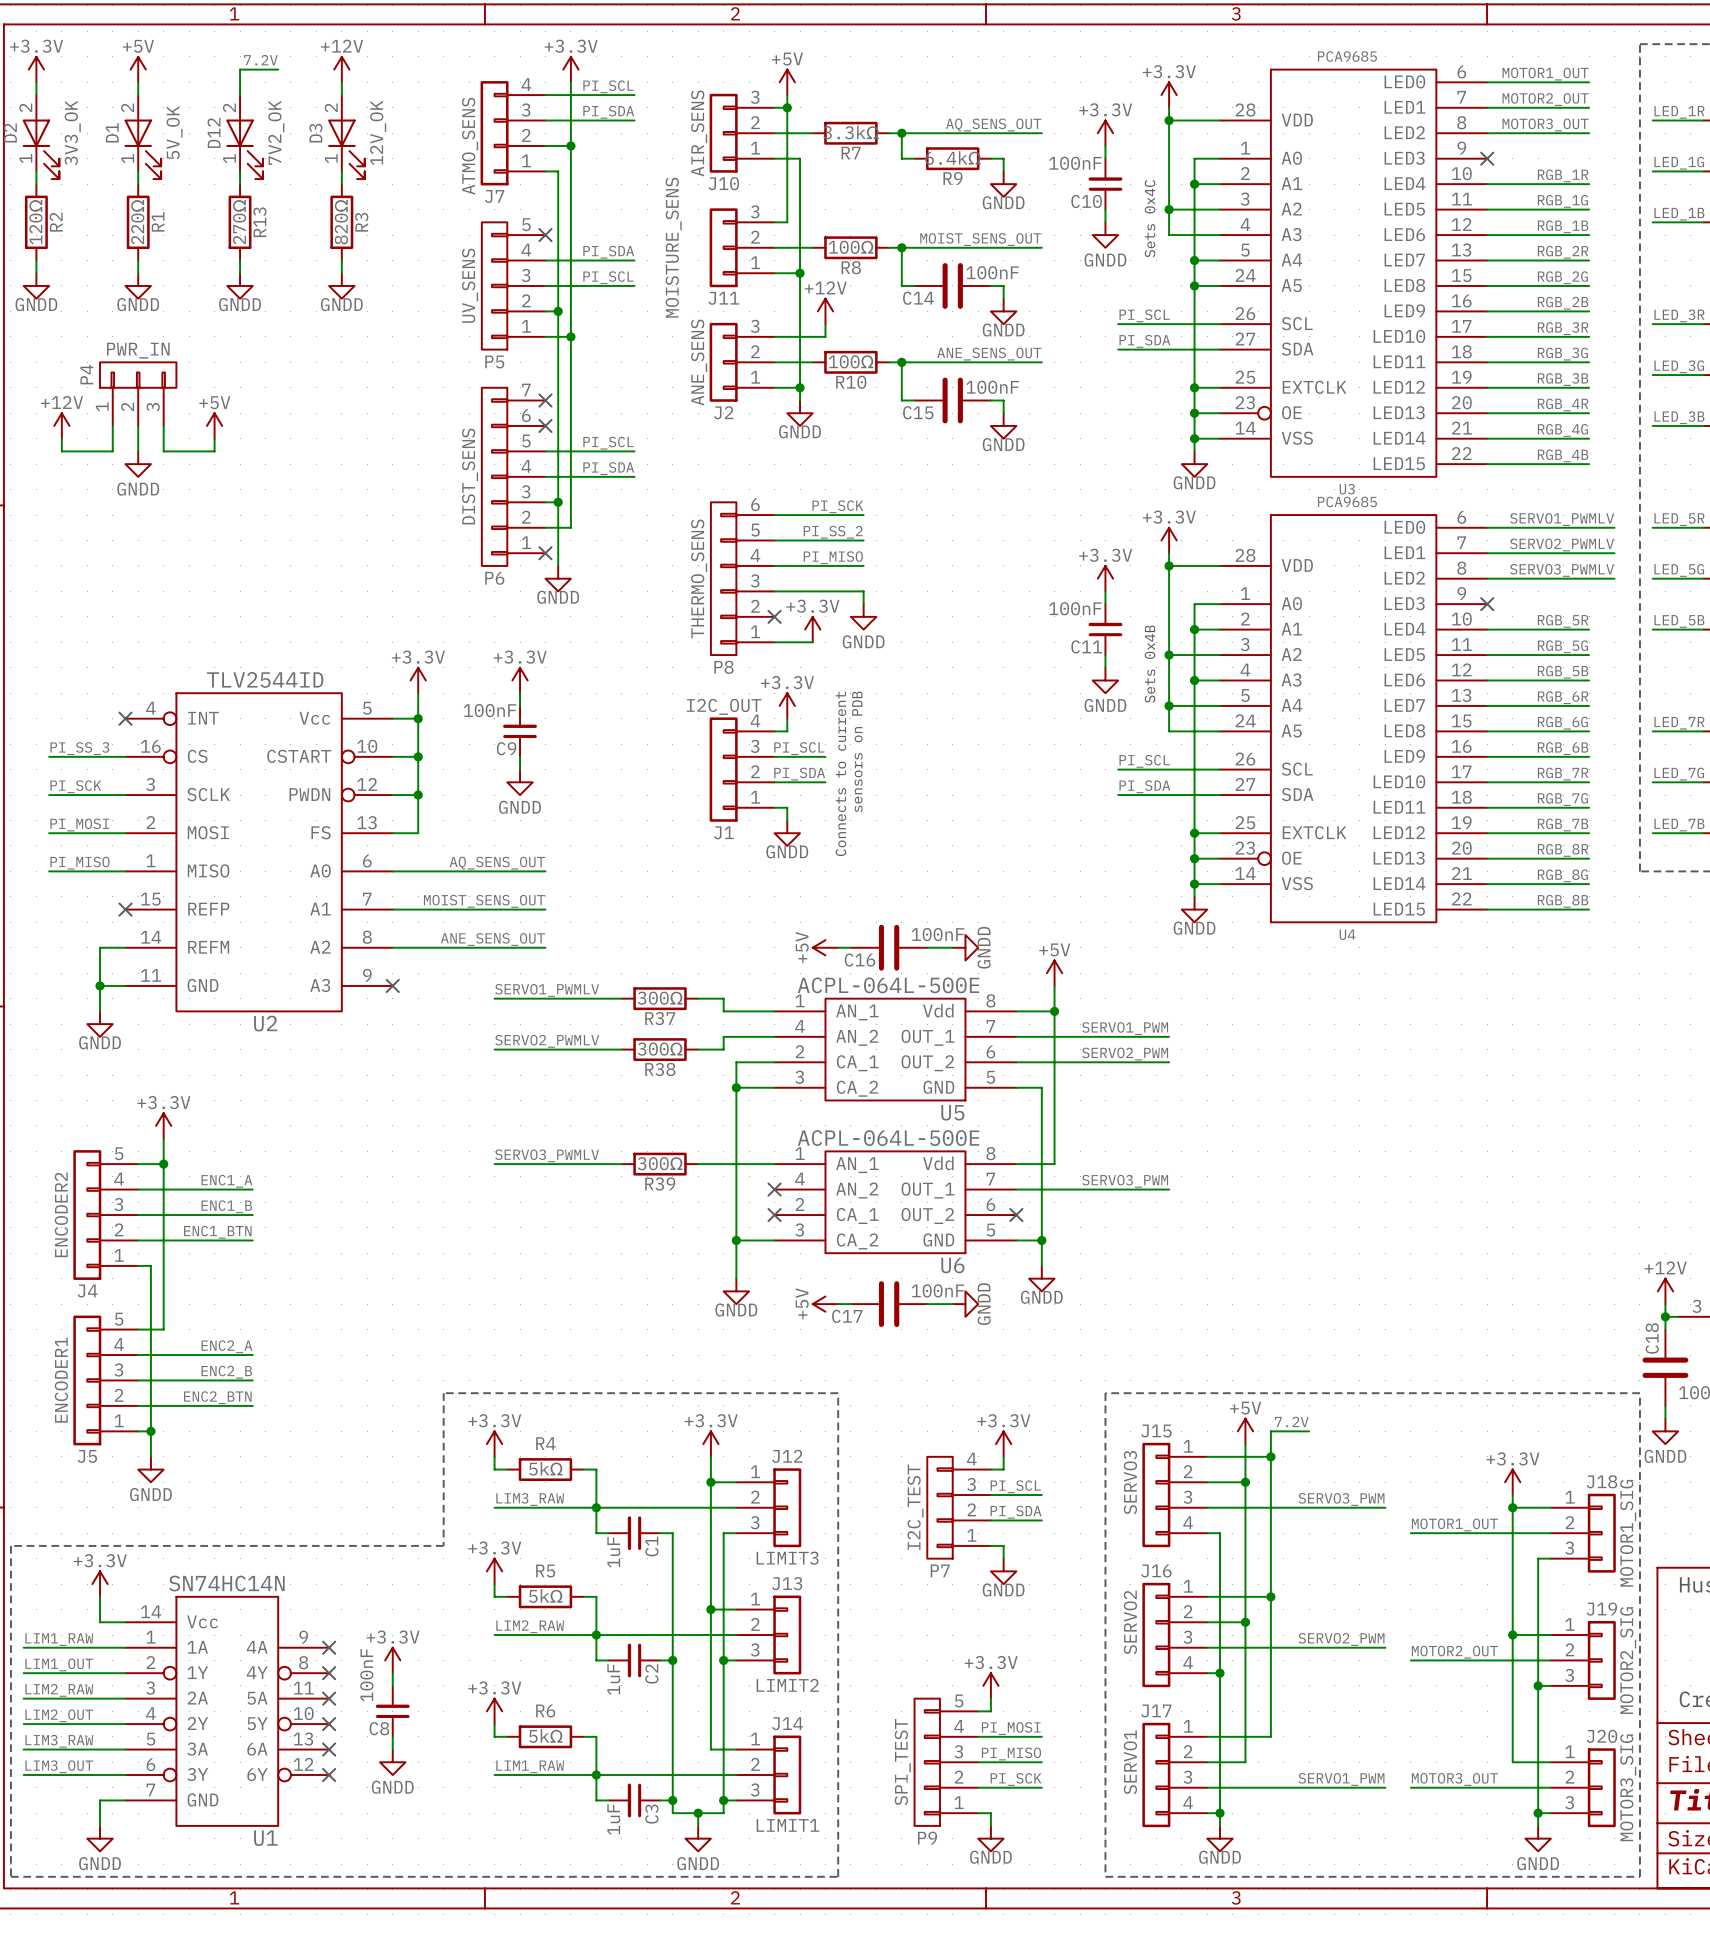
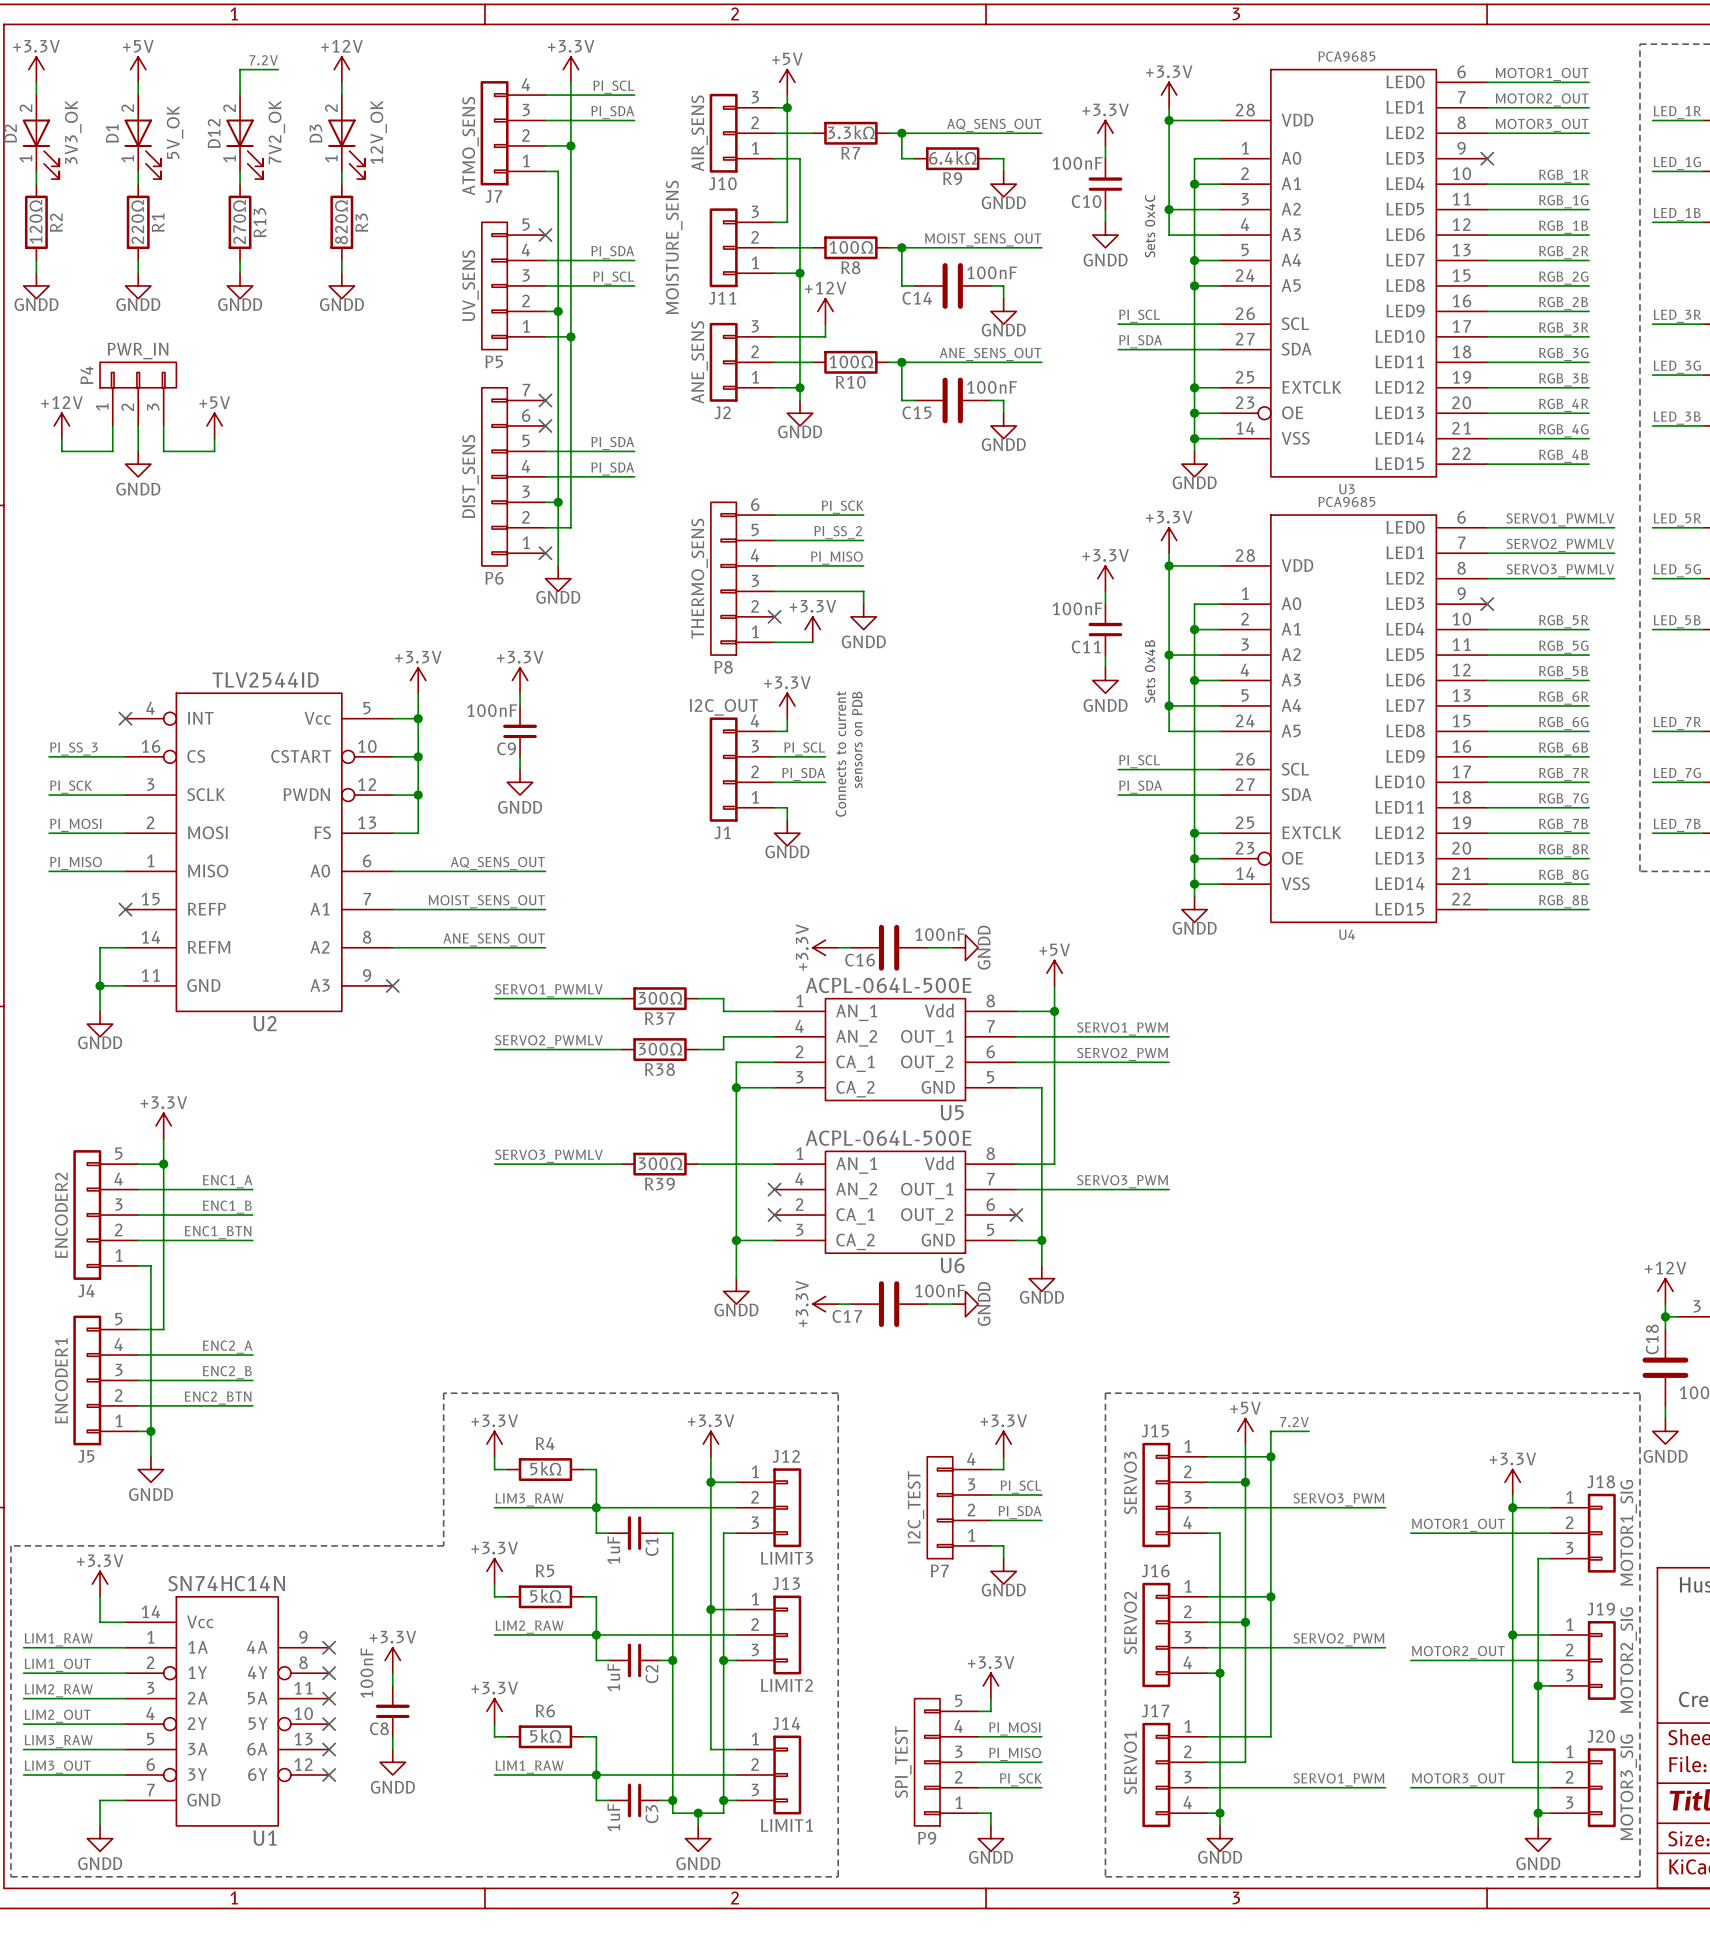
label: PI_SCL (608, 443) -> PI_SDA (612, 443)
power symbol: +5V (825, 947) -> +3.3V (825, 947)
power symbol: +5V (825, 1304) -> +3.3V (825, 1304)

